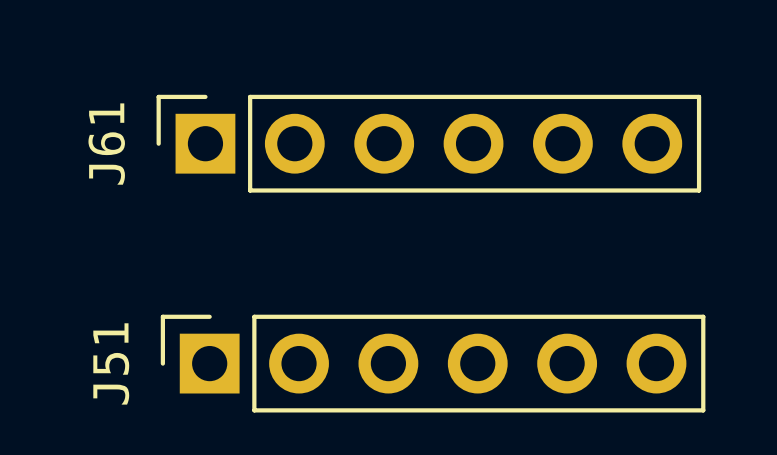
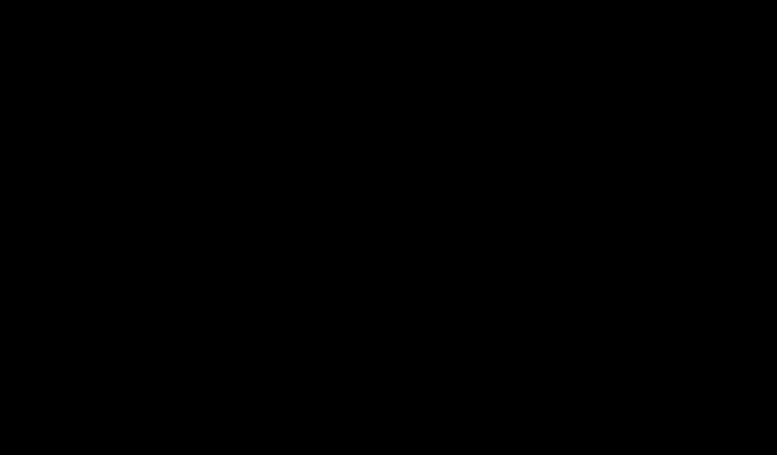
J61: (428, 143) -> none
J51: (433, 363) -> none

